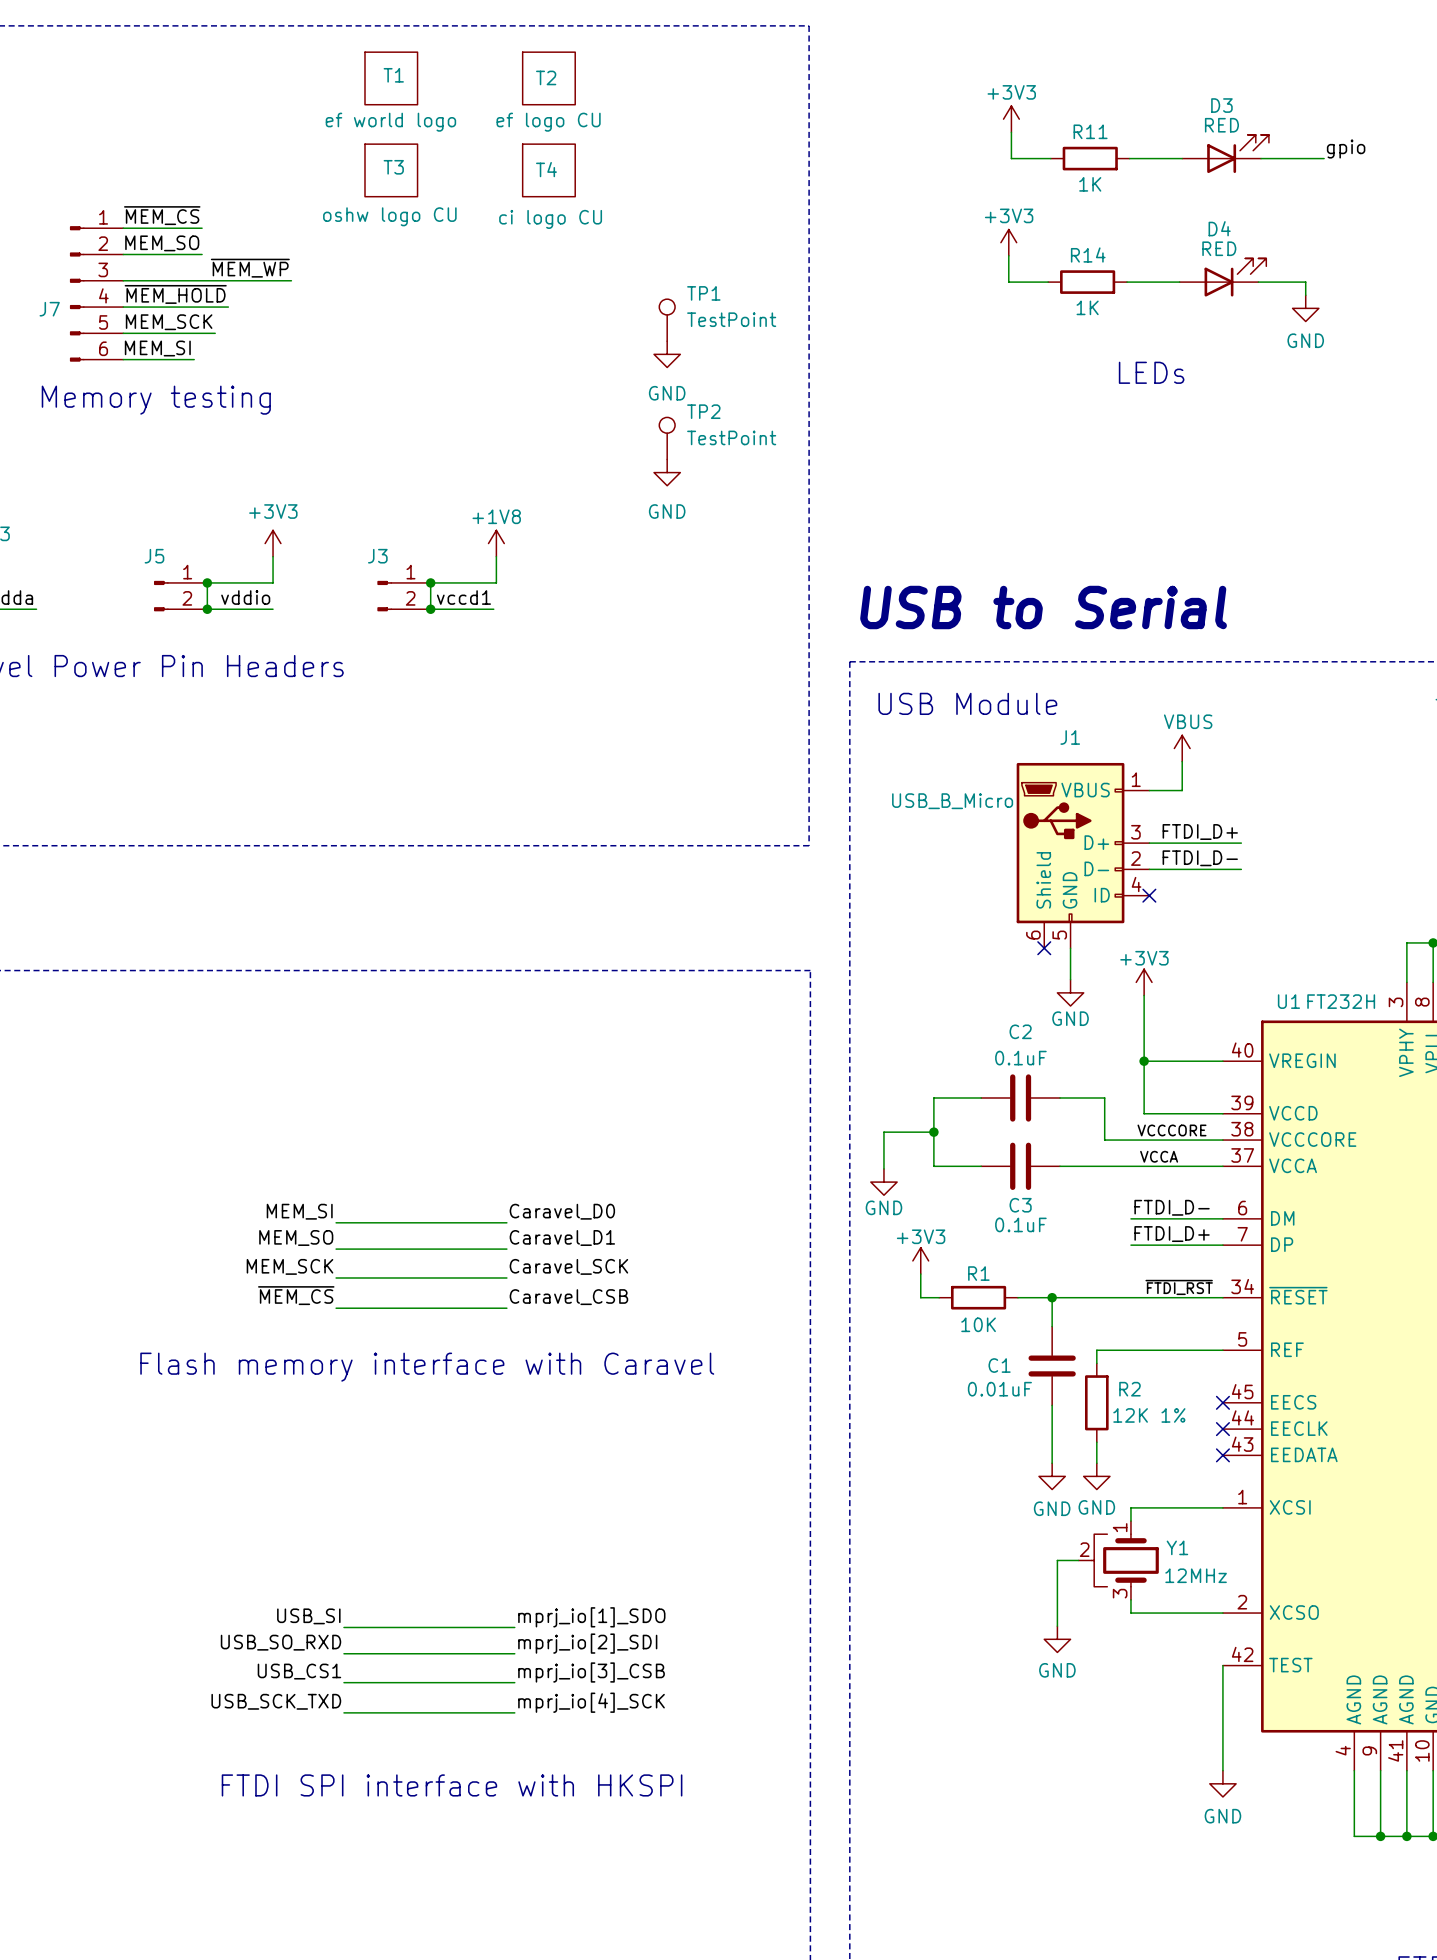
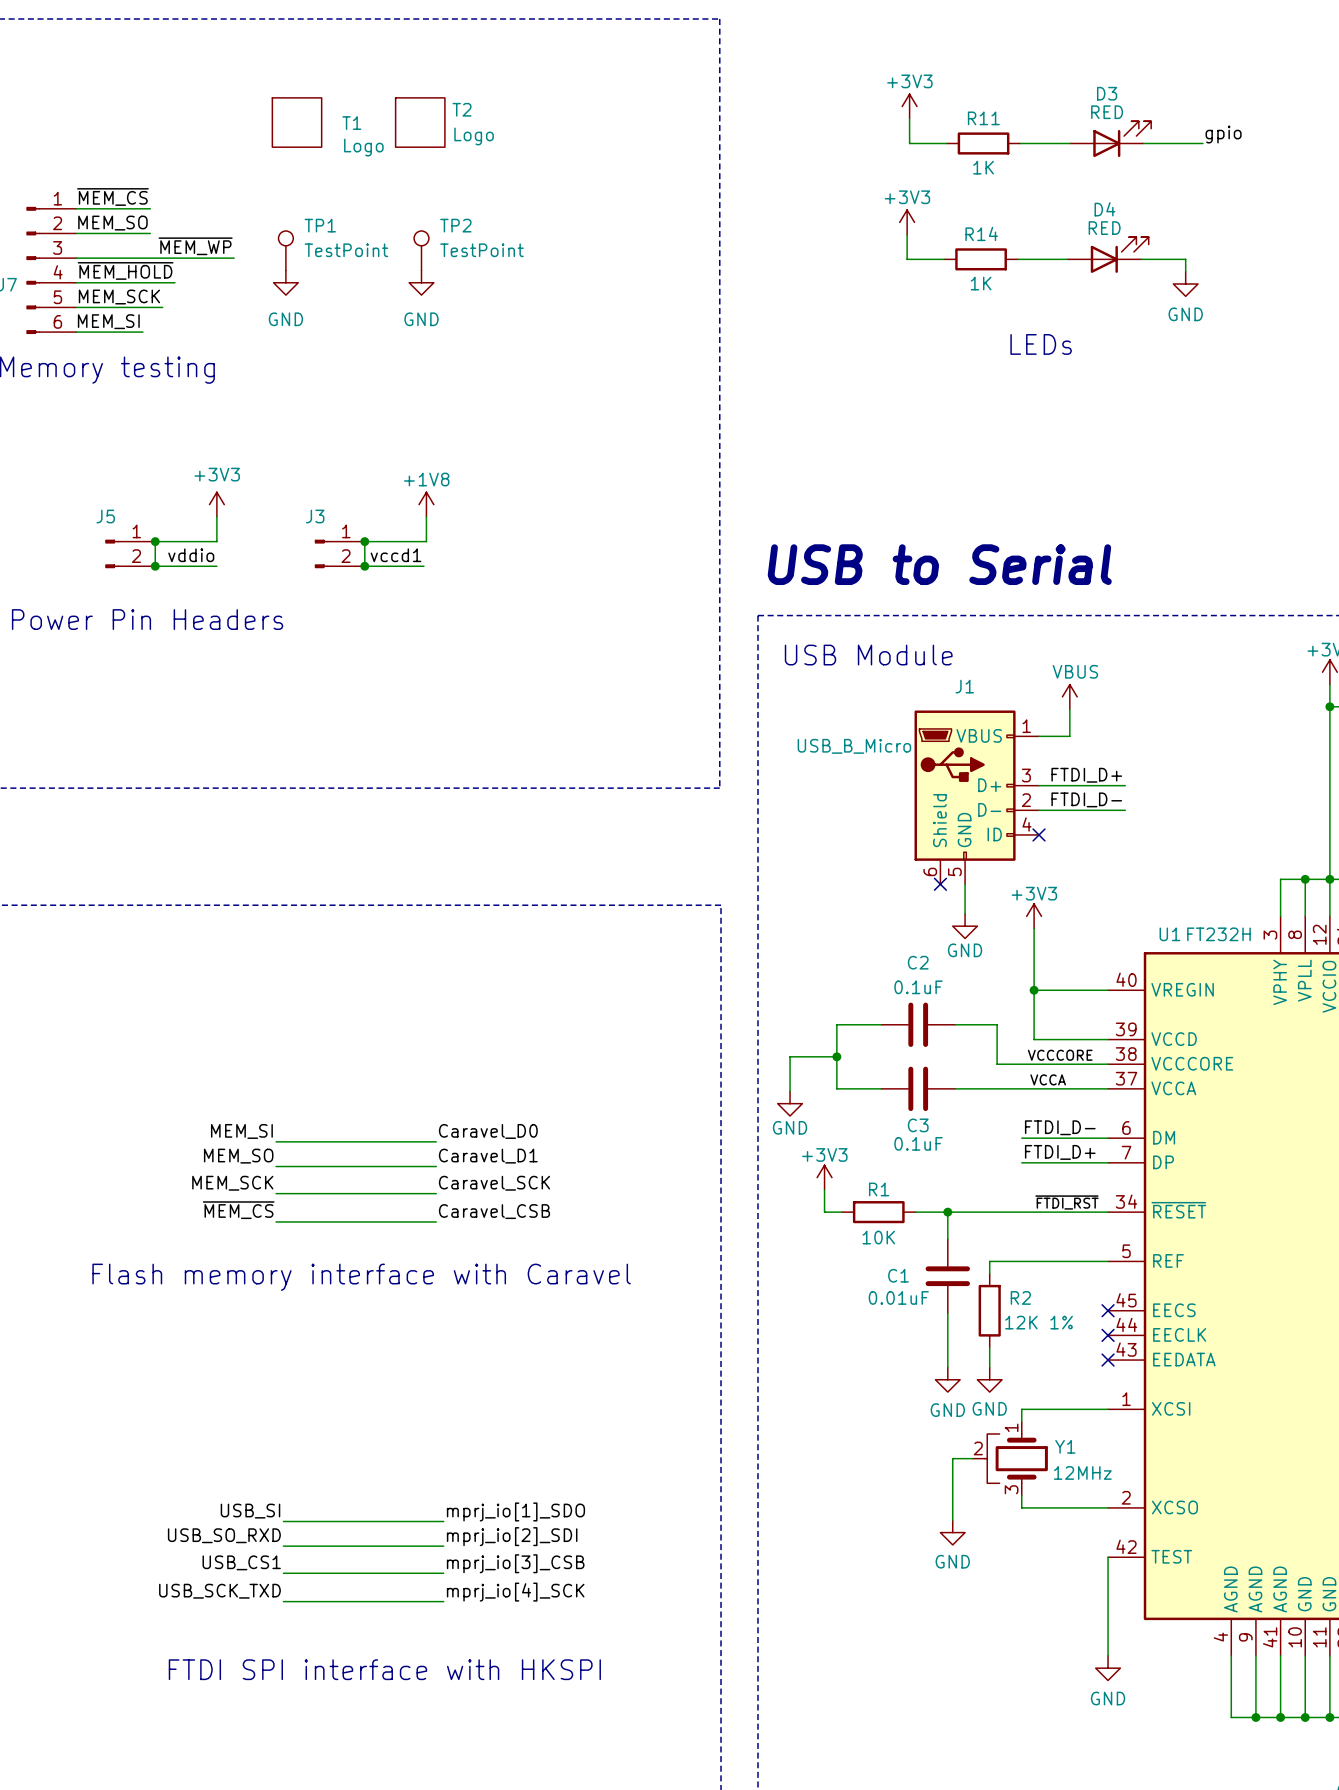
T1 name position: T1 (393, 75) -> T1 (351, 123)
T2 name position: T2 (546, 77) -> T2 (462, 109)
T1 position: (391, 78) -> (297, 122)
T2 position: (548, 78) -> (420, 122)
T1 value: ef world logo (390, 122) -> Logo (363, 147)
T2 value: ef logo CU (548, 122) -> Logo (474, 136)
T3: oshw logo CU (391, 170) -> none
T4: ci logo CU (548, 170) -> none
power symbol: none -> GND (285, 282)
power symbol: none -> GND (421, 282)
TP1 position: (667, 320) -> (285, 250)
power symbol: GND (667, 354) -> none
TP2 position: (667, 438) -> (421, 250)
power symbol: GND (667, 472) -> none

